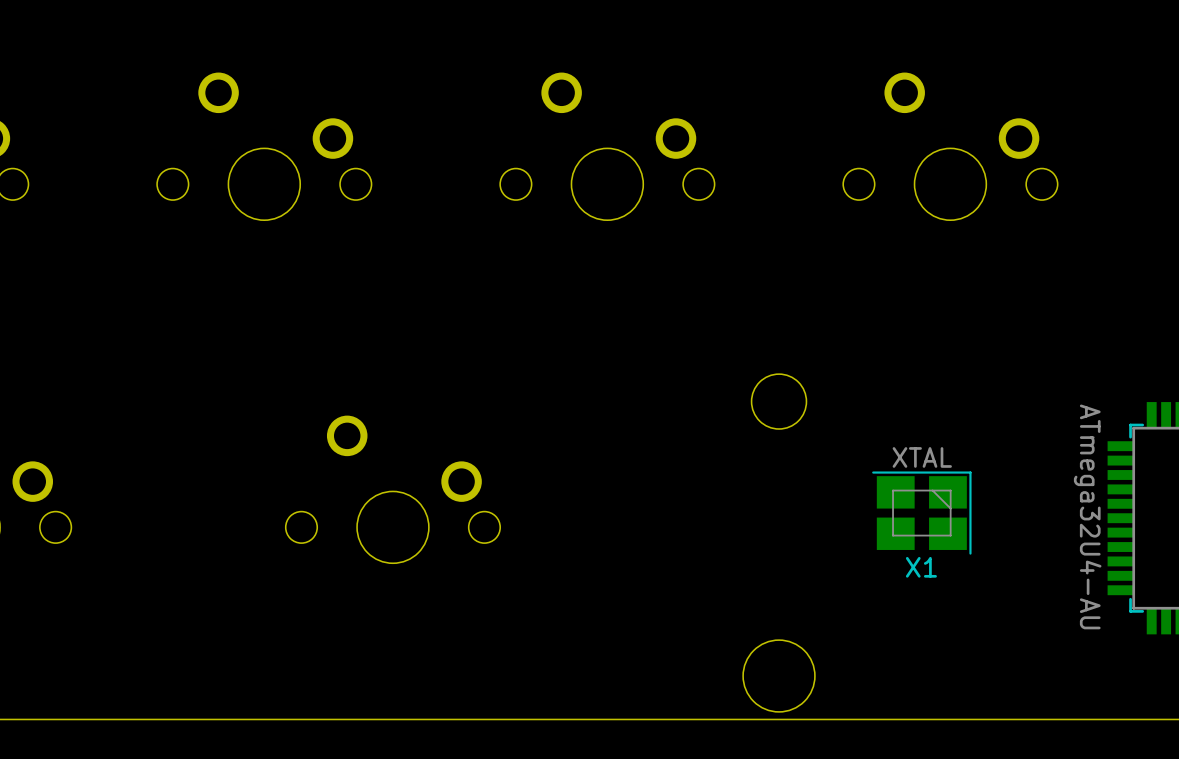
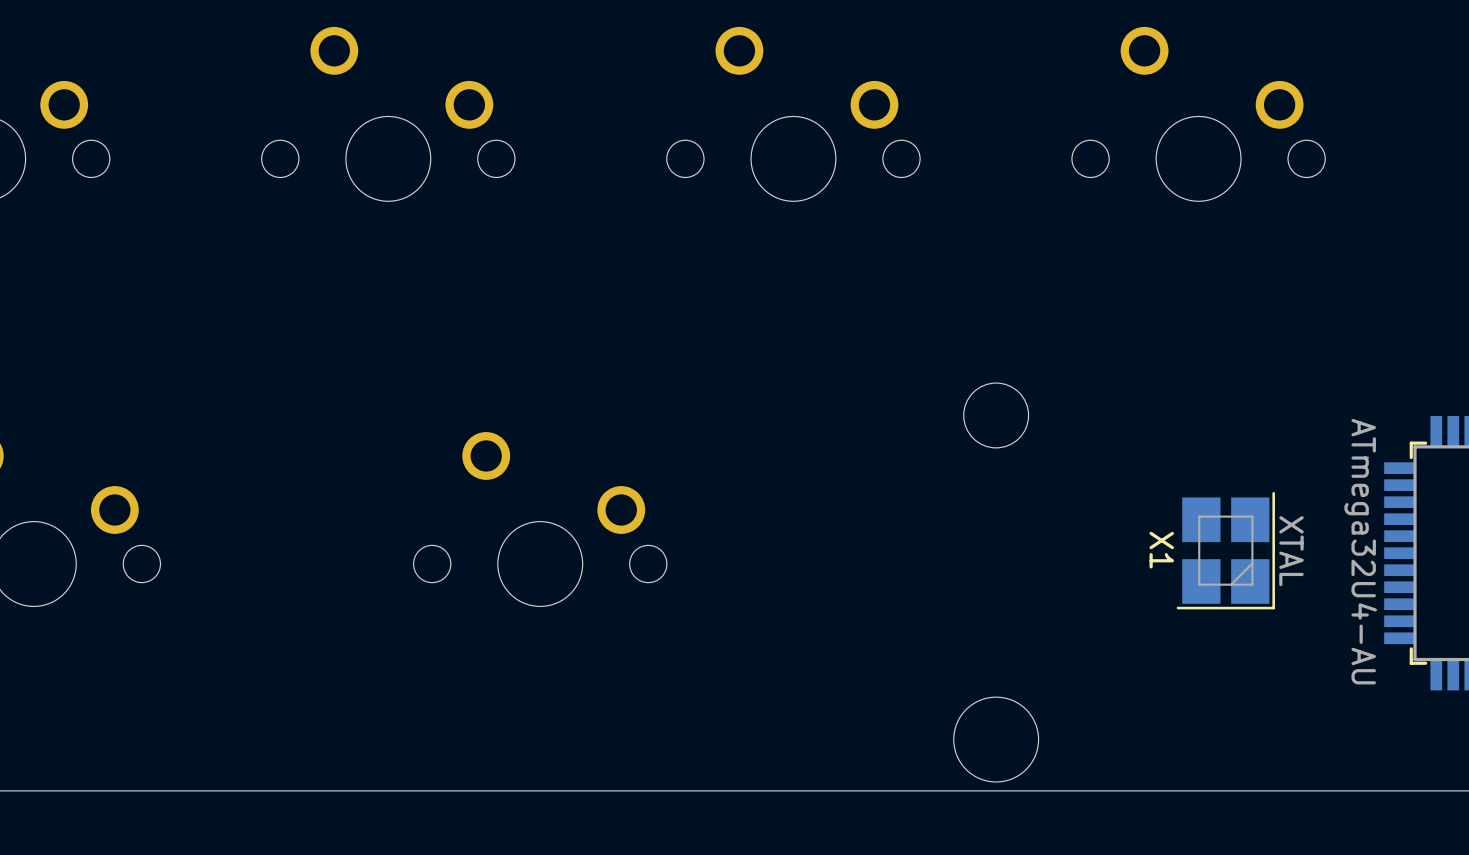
X1 rotation: 0° (921, 513) -> 90° clockwise (1225, 550)

